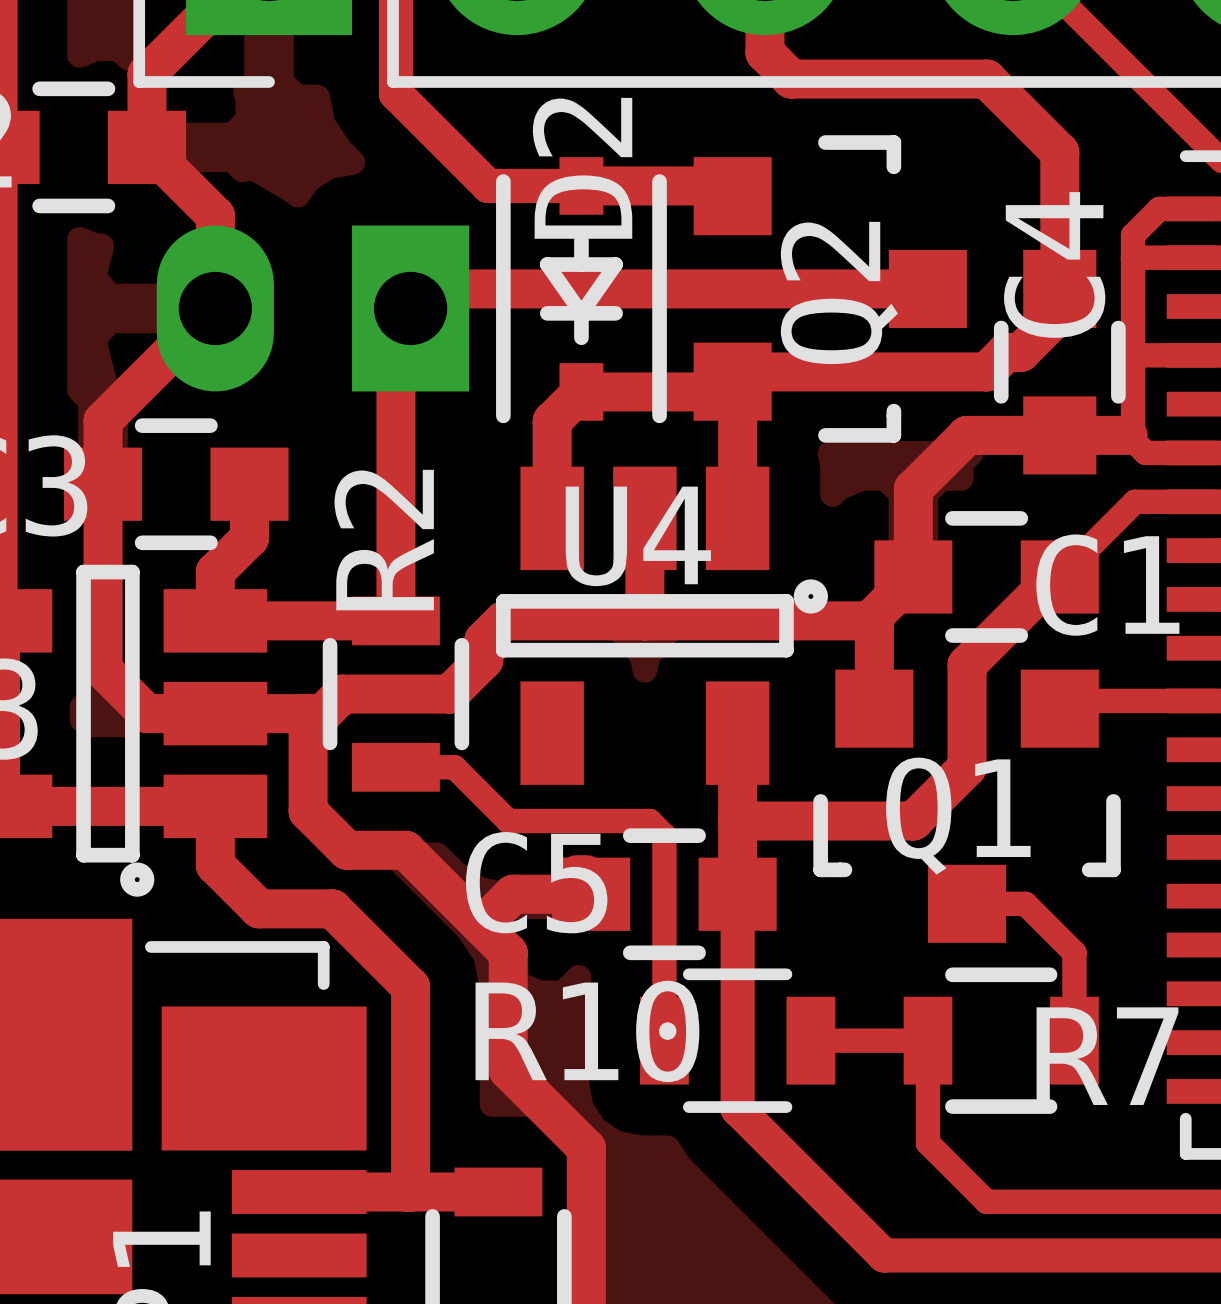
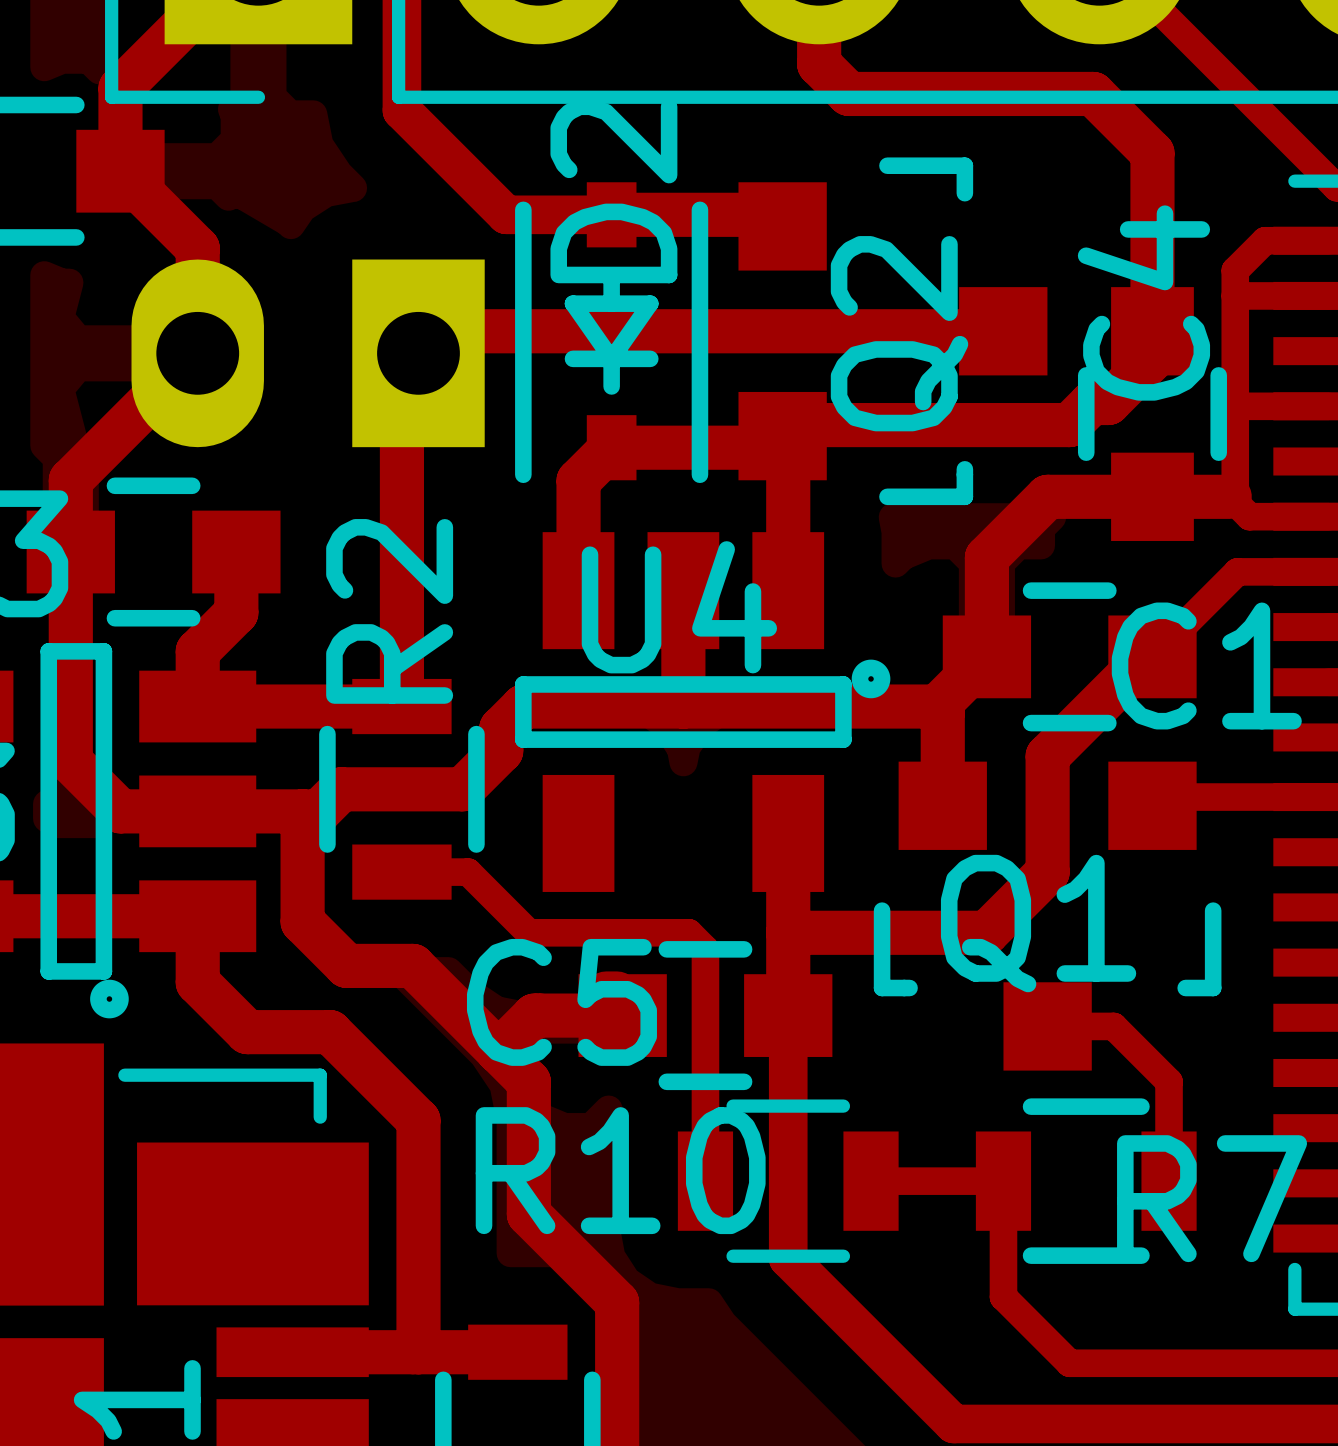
track: (986, 79) (1059, 152) -> (1069, 93) (1093, 93) (1152, 153) (1152, 176)

